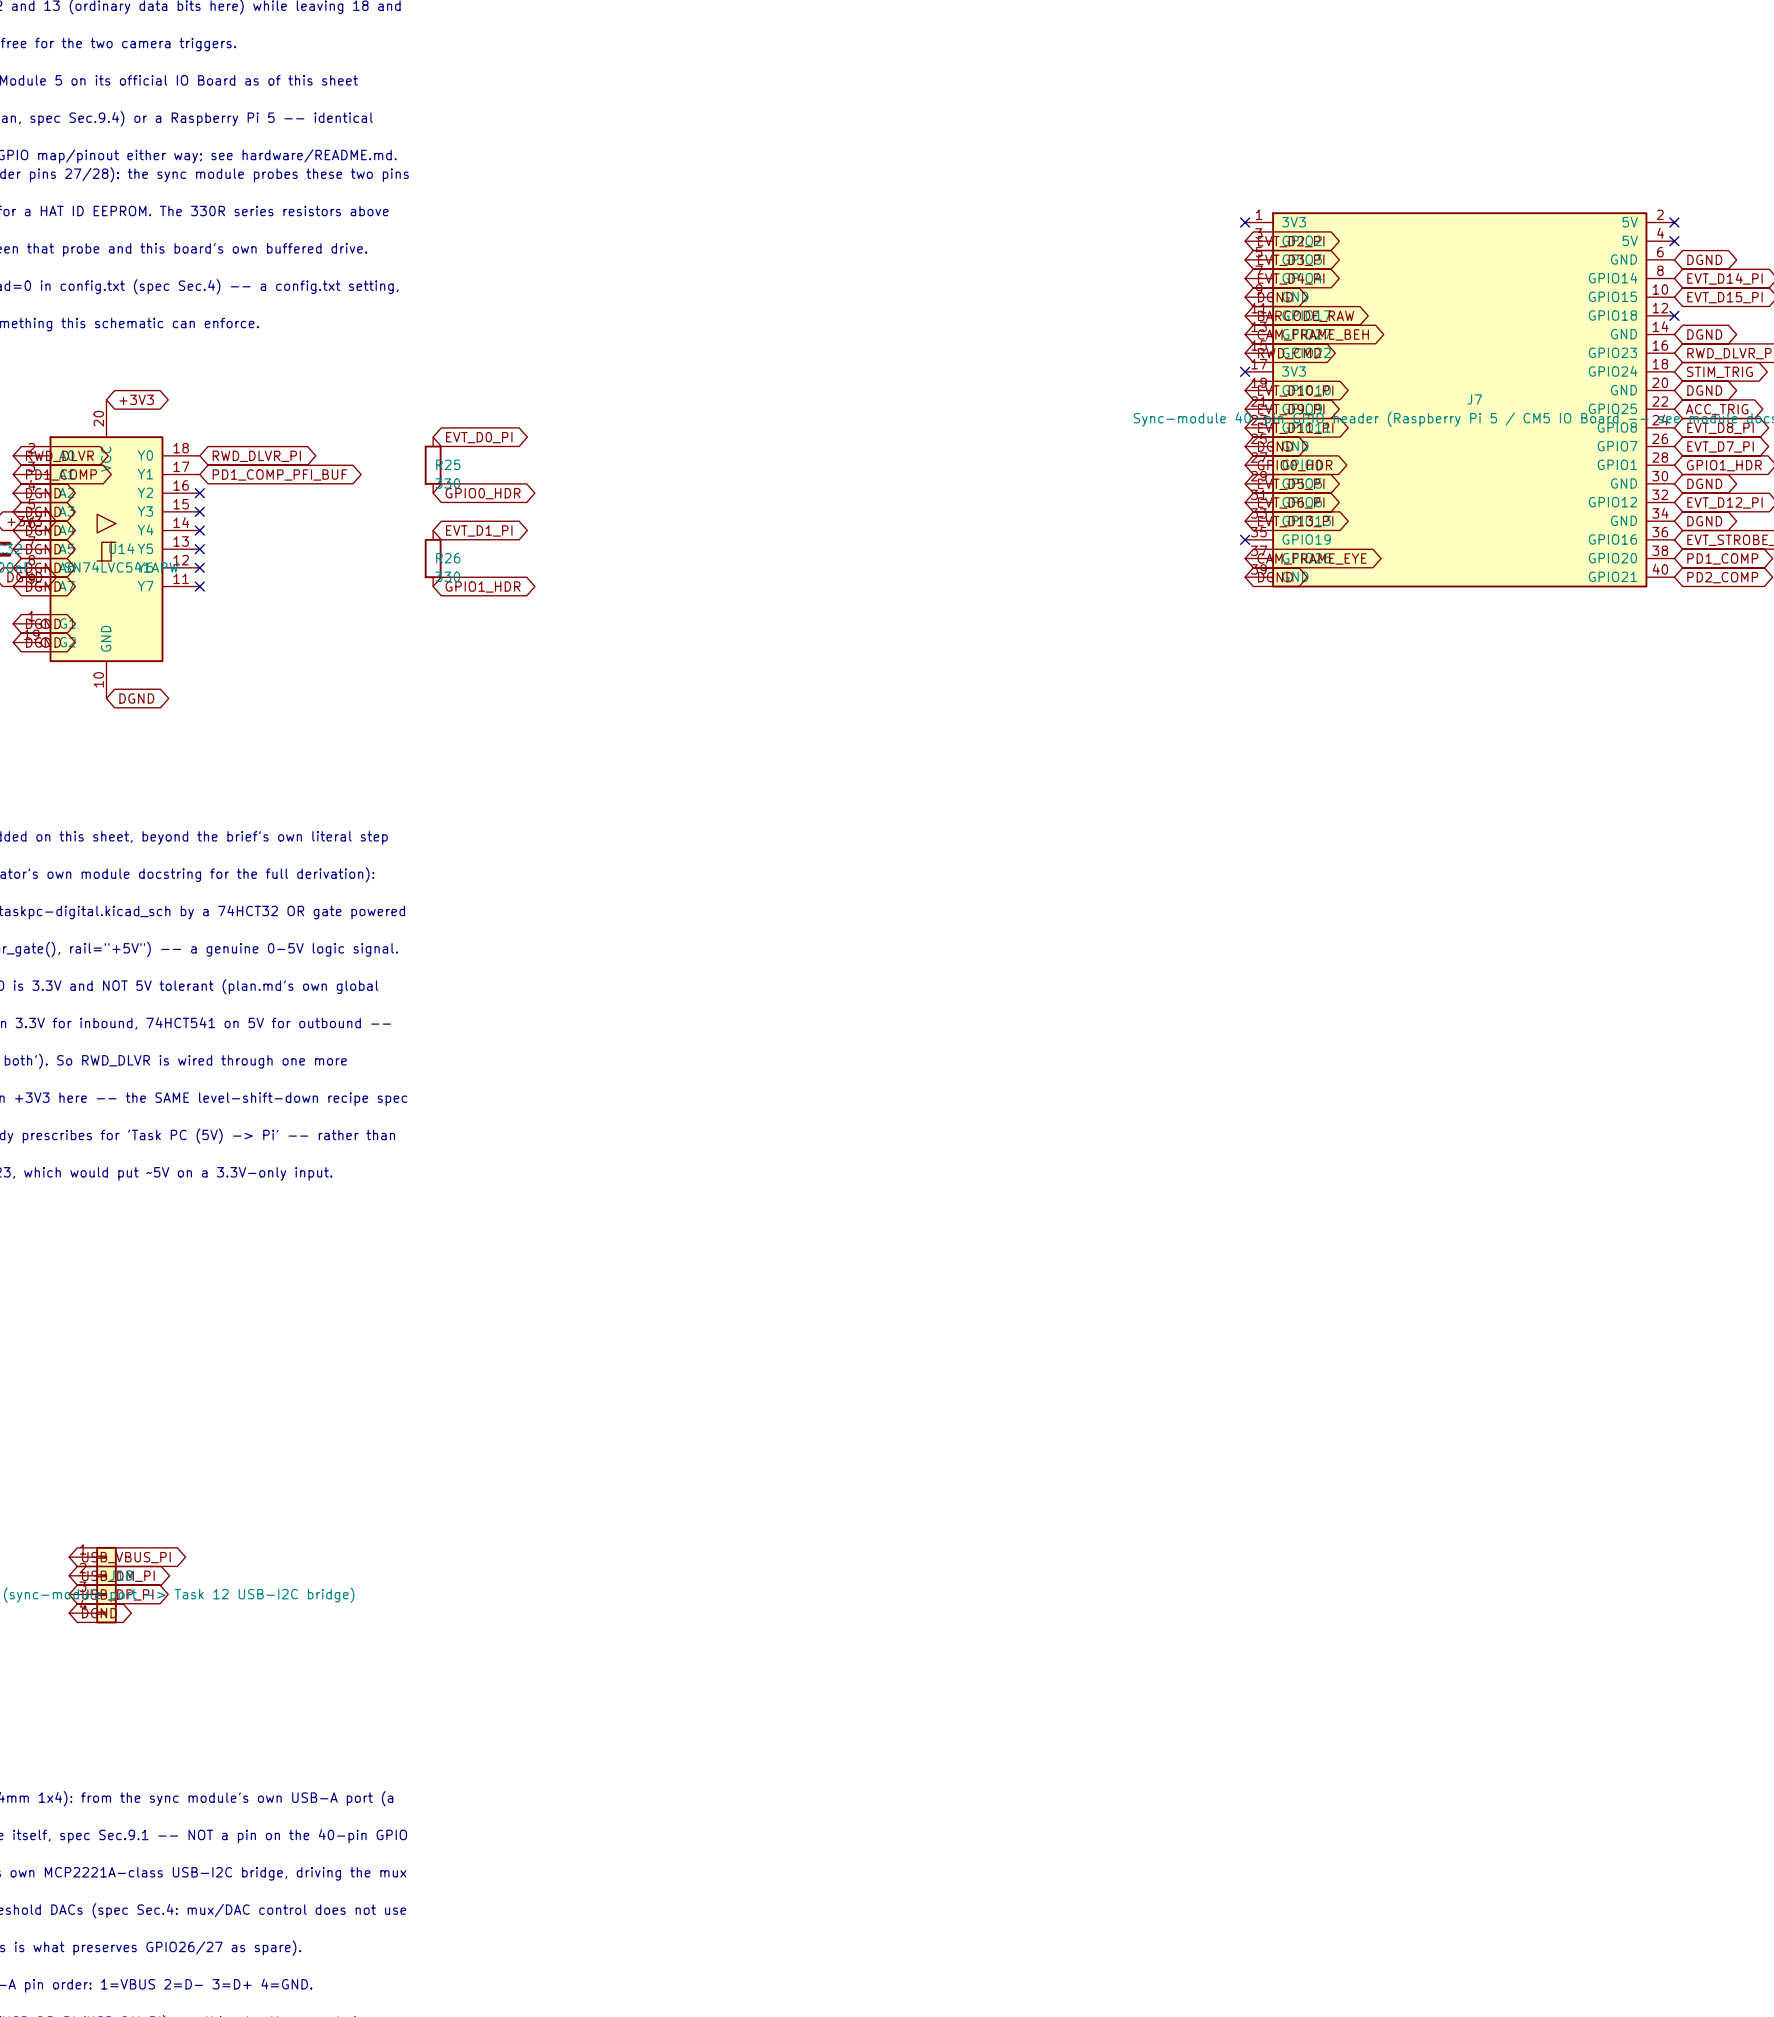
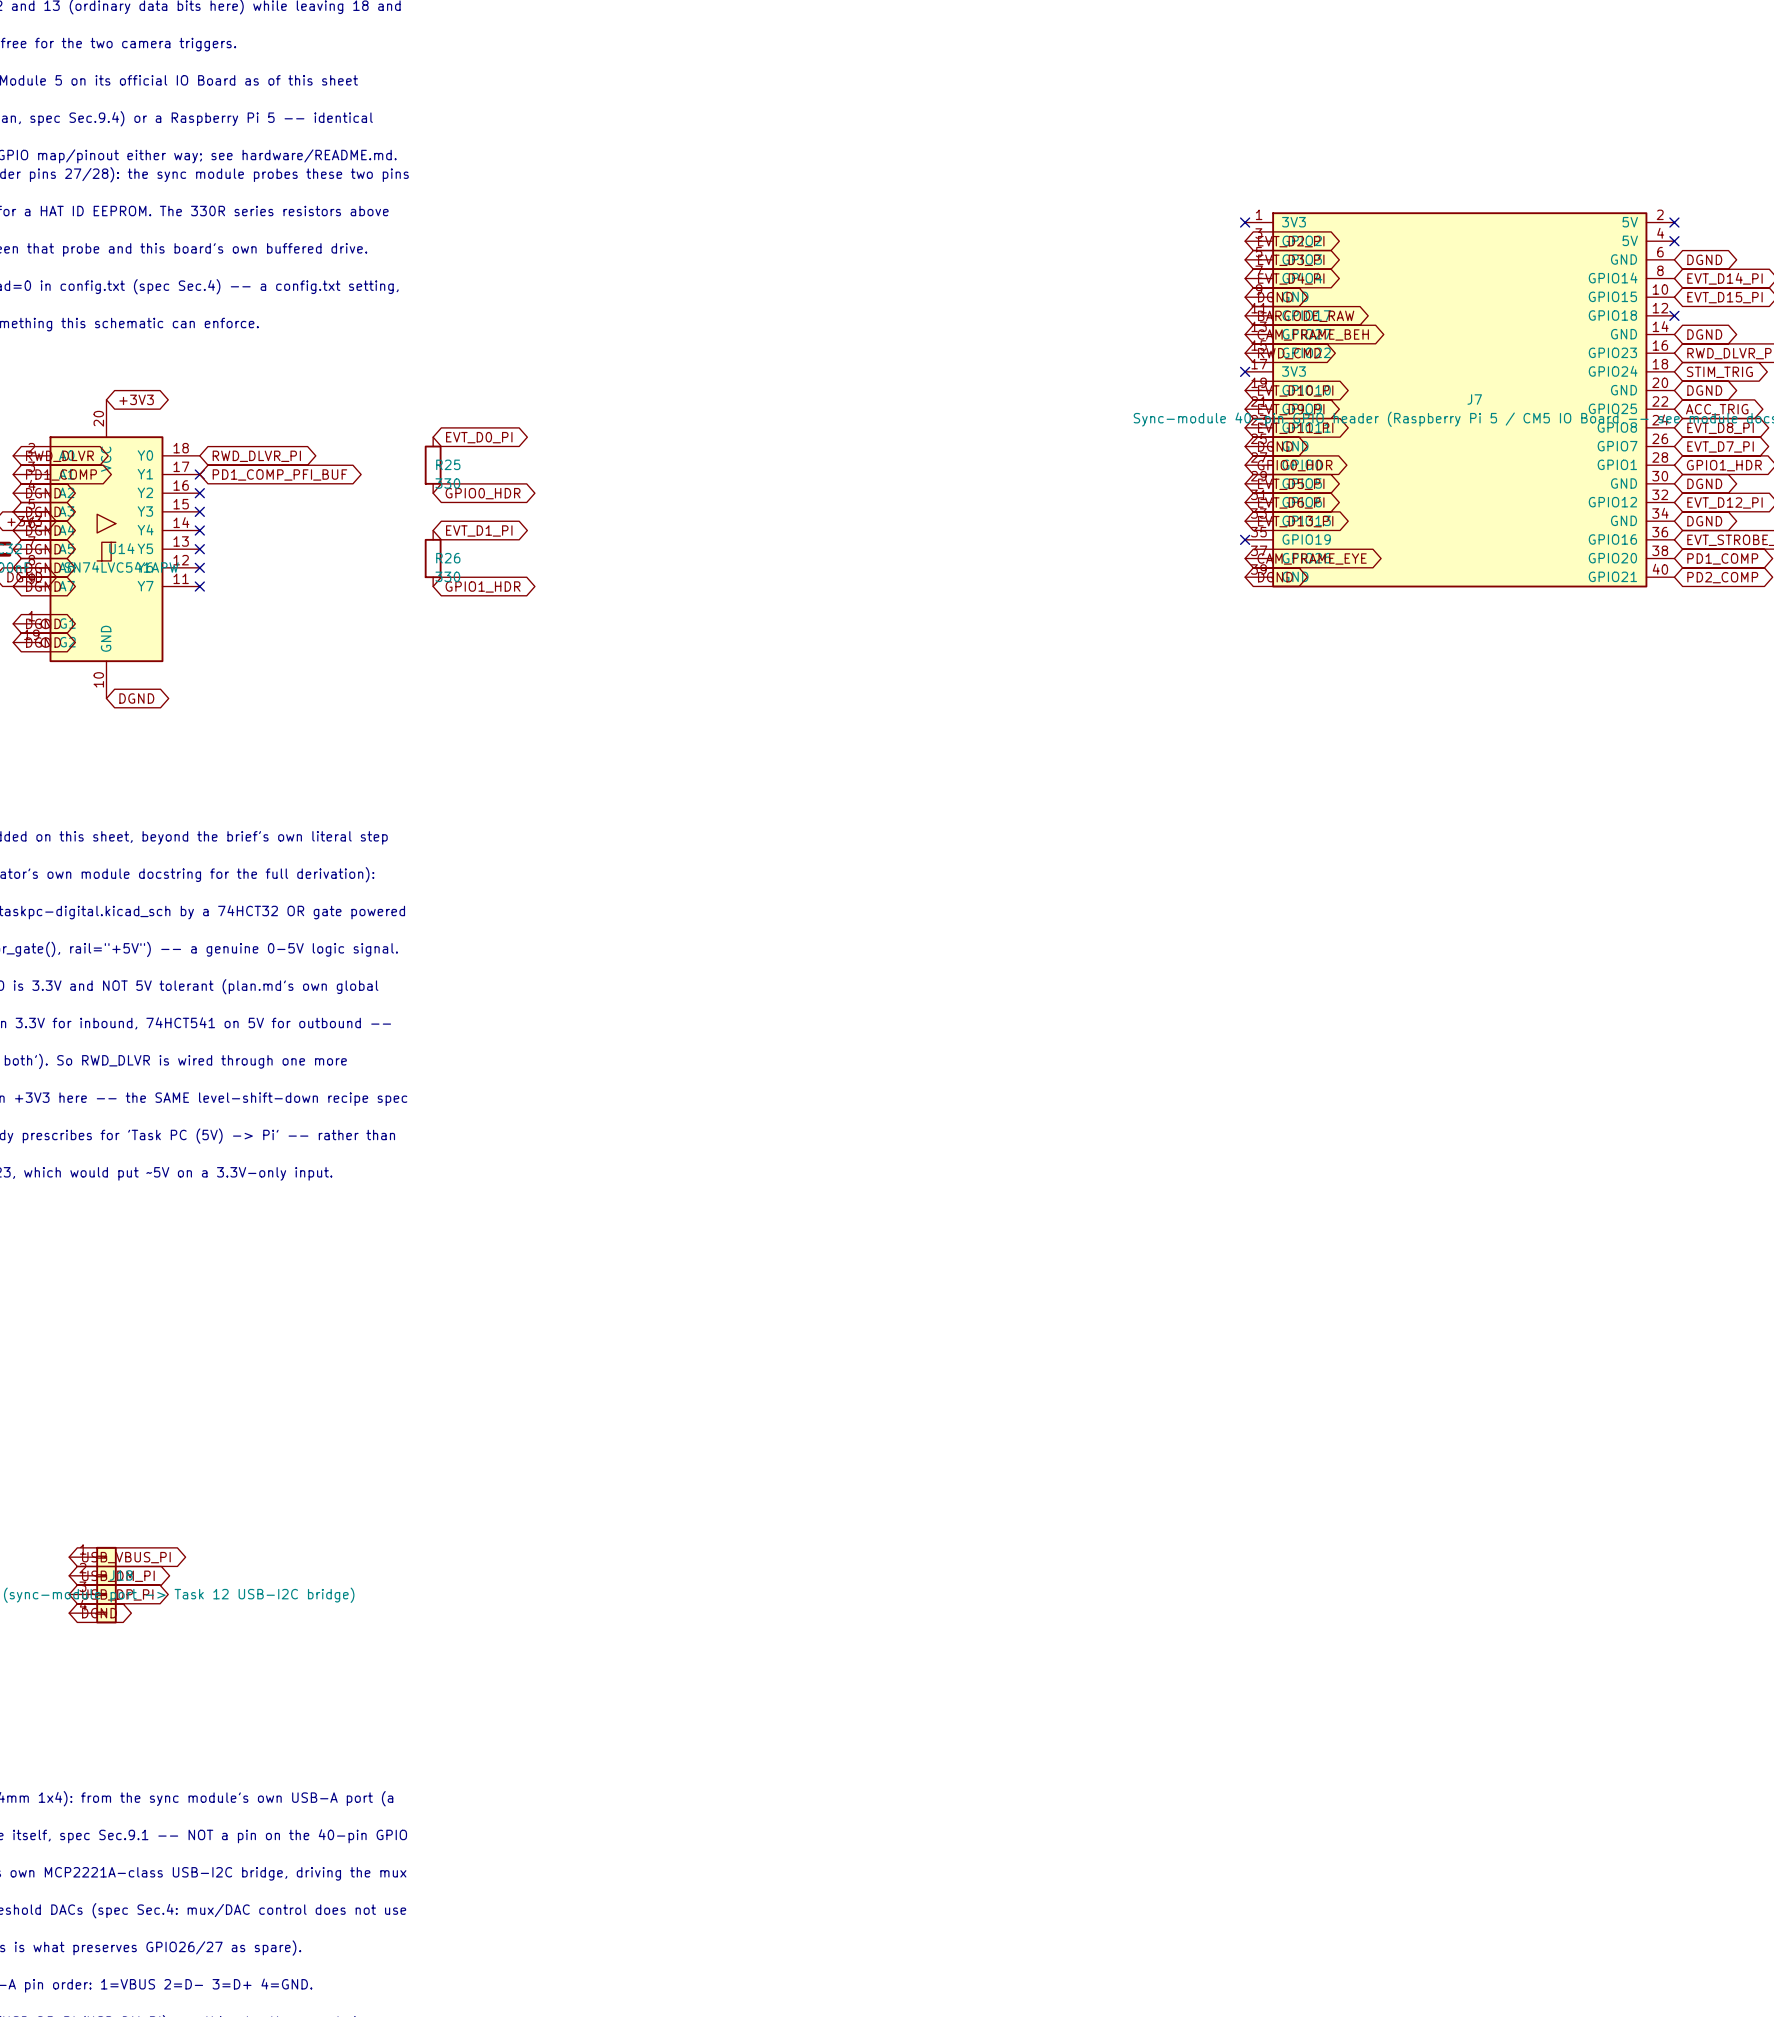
no-connect mark: none -> (199, 474)

